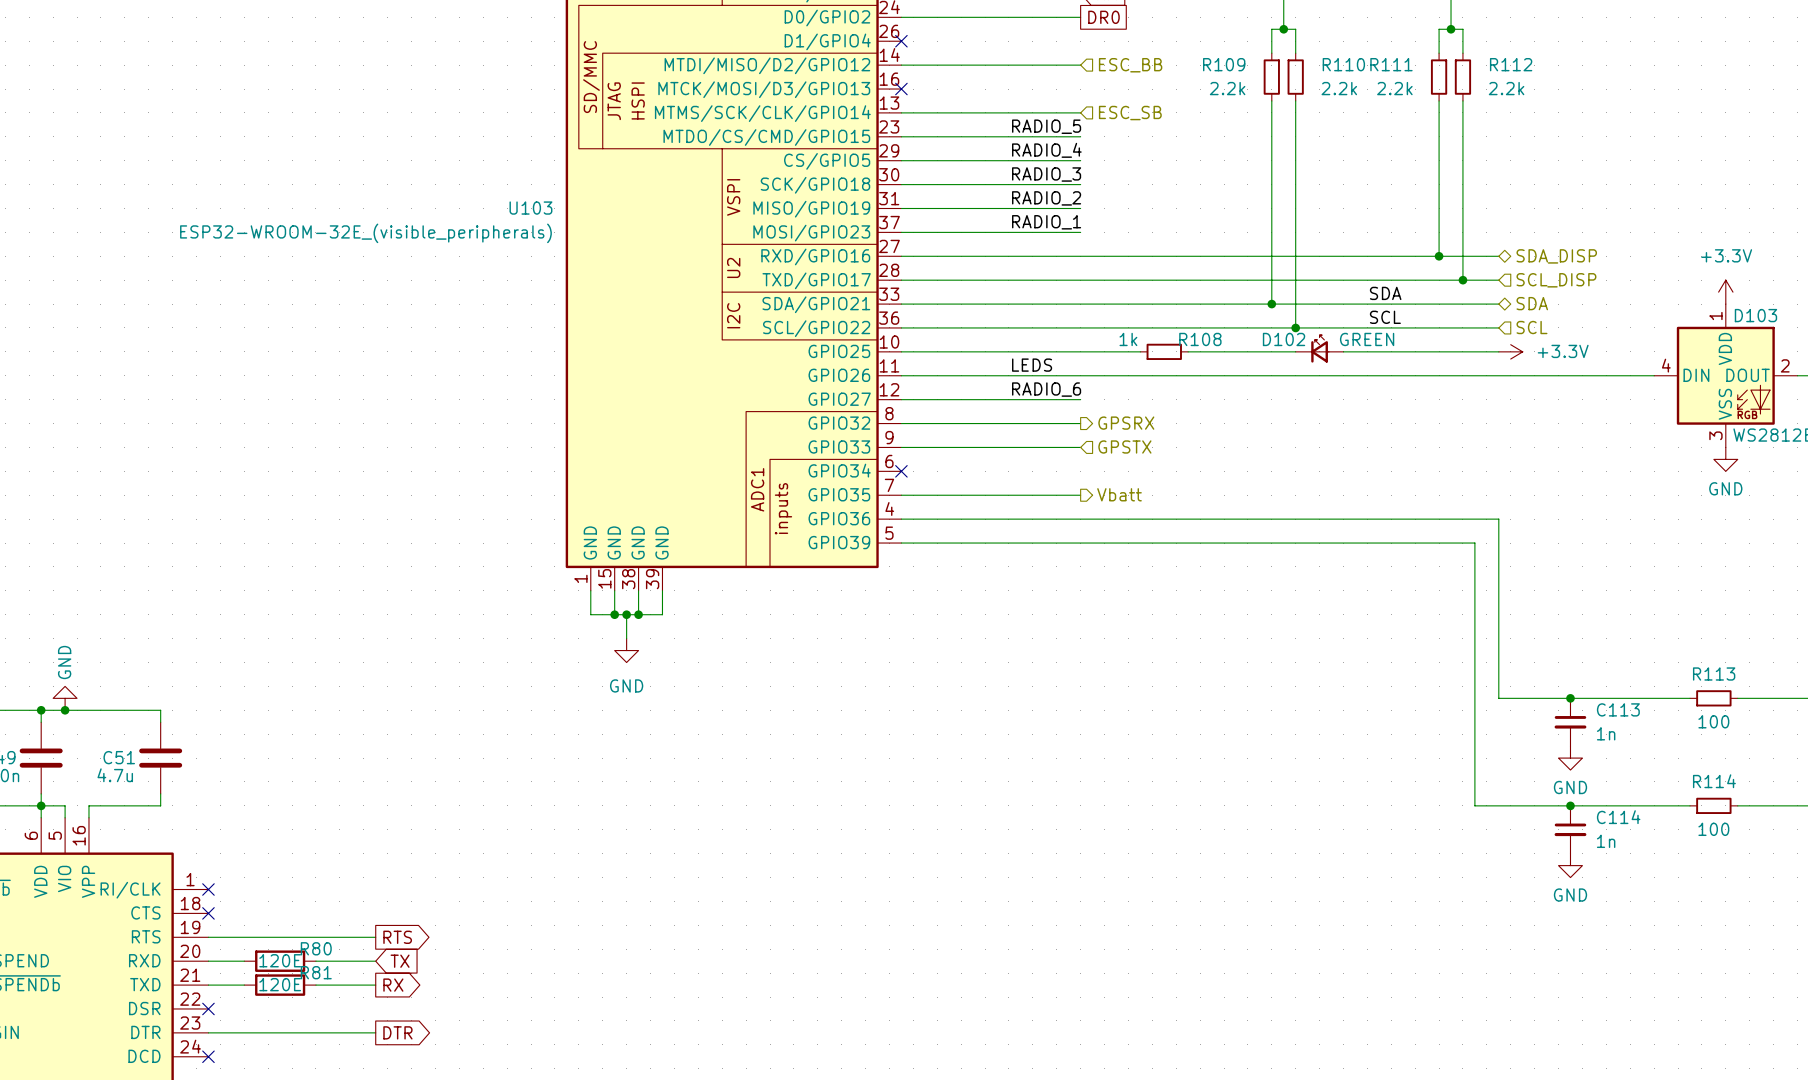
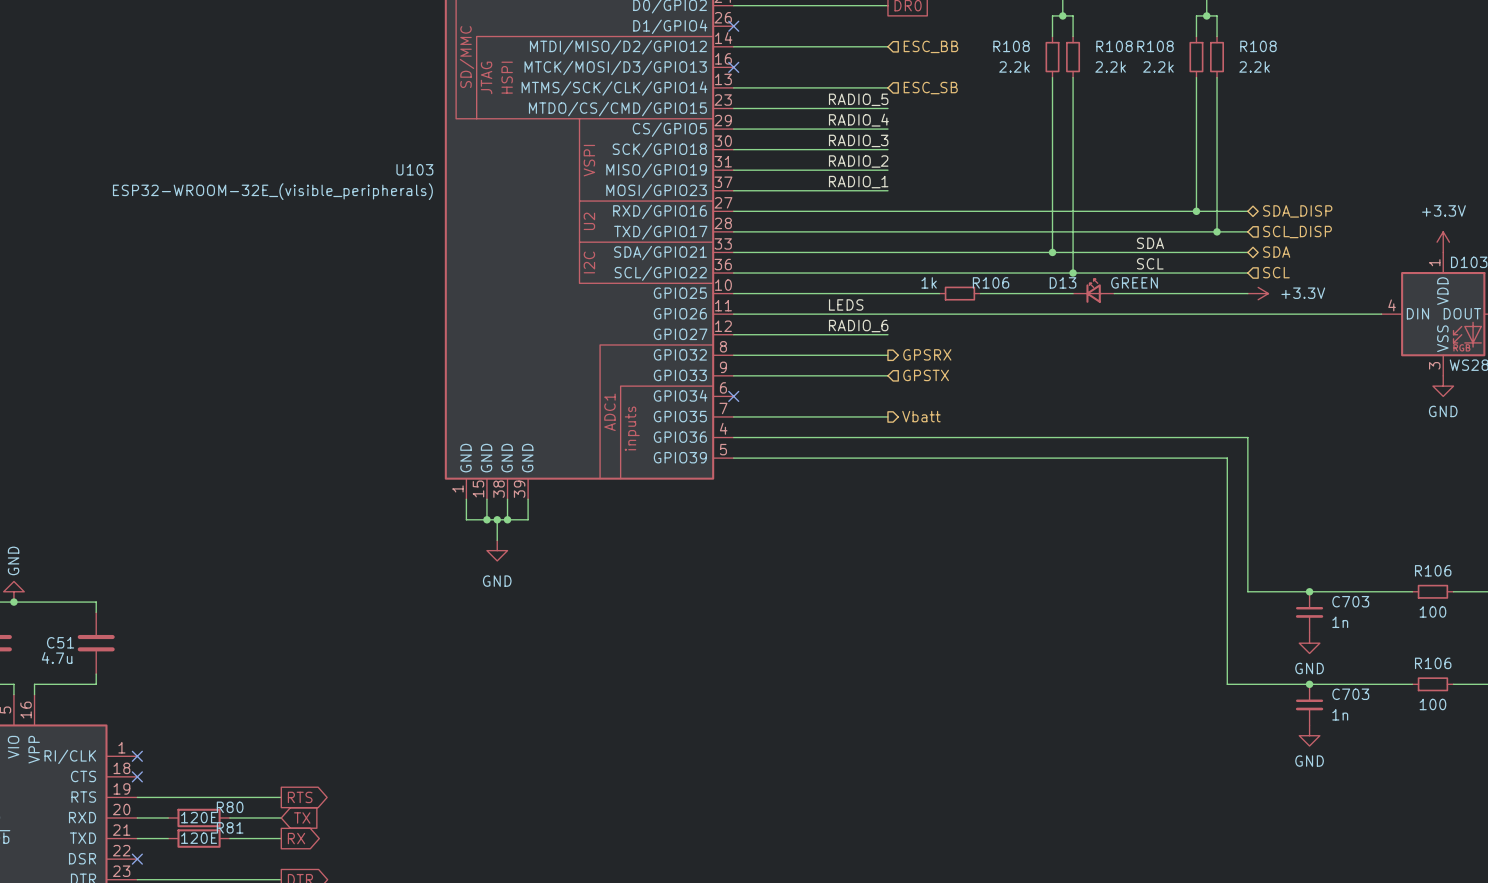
R109 name: R109 (1224, 64) -> R108 (1011, 46)
R110 name: R110 (1343, 64) -> R108 (1114, 46)
R111 name: R111 (1391, 64) -> R108 (1155, 46)
R112 name: R112 (1511, 64) -> R108 (1258, 46)
R108 name: R108 (1200, 339) -> R106 (991, 282)
D102 name: D102 (1284, 339) -> D13 (1063, 282)
R113 name: R113 (1714, 674) -> R106 (1433, 570)
C113 name: C113 (1618, 709) -> C703 (1350, 601)
R114 name: R114 (1714, 781) -> R106 (1433, 663)
C114 name: C114 (1618, 817) -> C703 (1350, 694)

